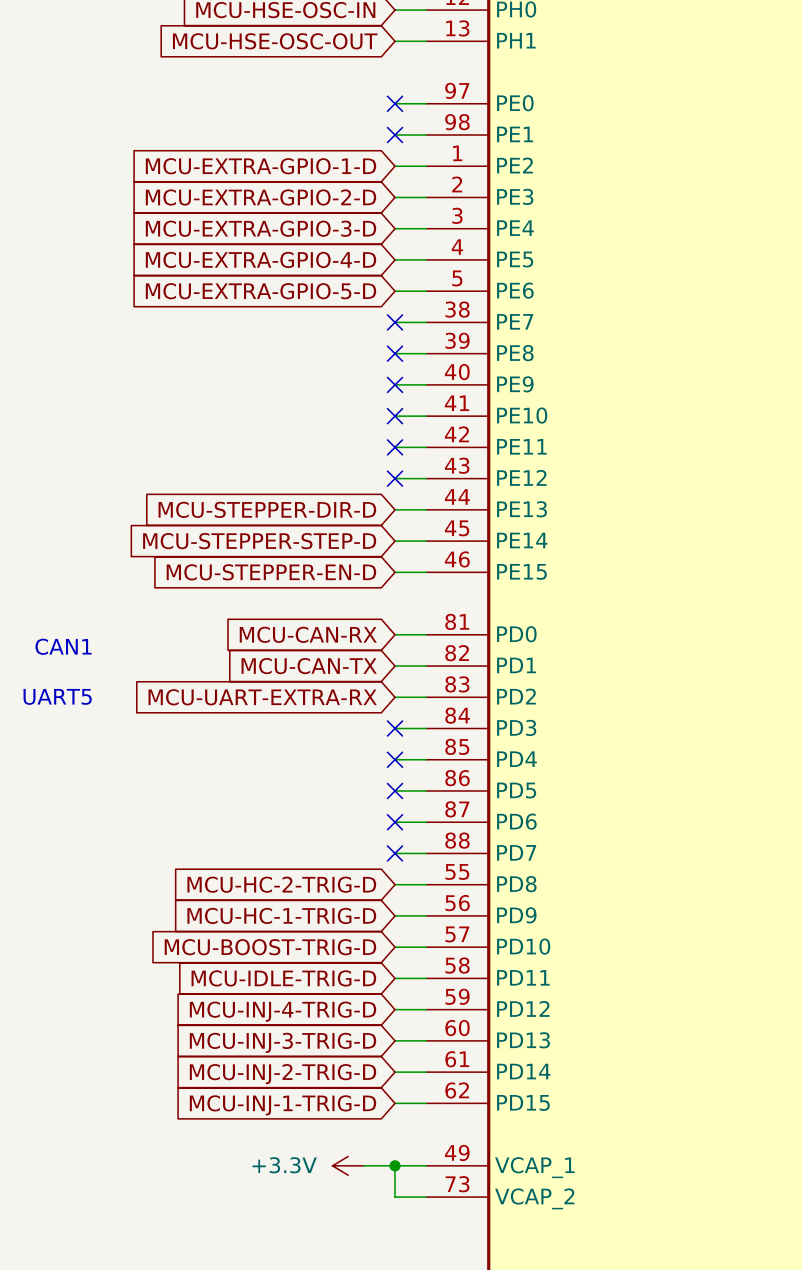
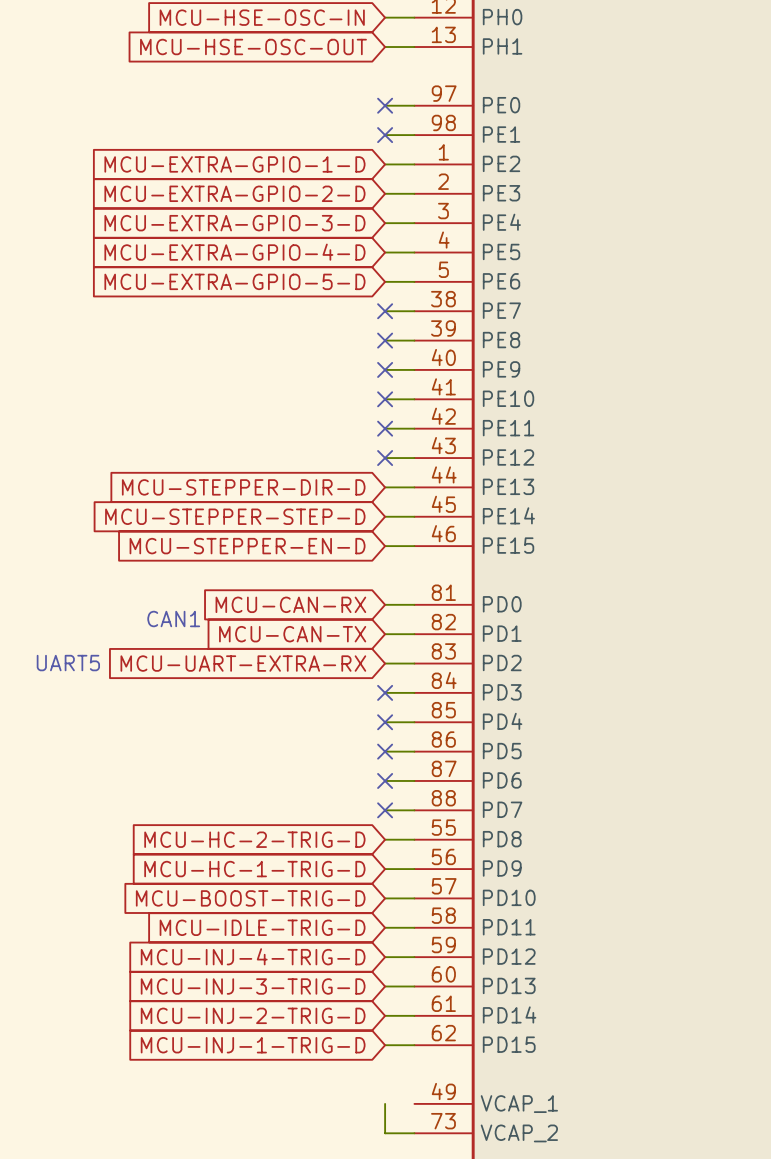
text position: CAN1 (63, 646) -> CAN1 (173, 619)
power symbol: +3.3V (348, 1165) -> none
wire: (363, 1165) (426, 1165) -> none
junction: (395, 1165) -> none

